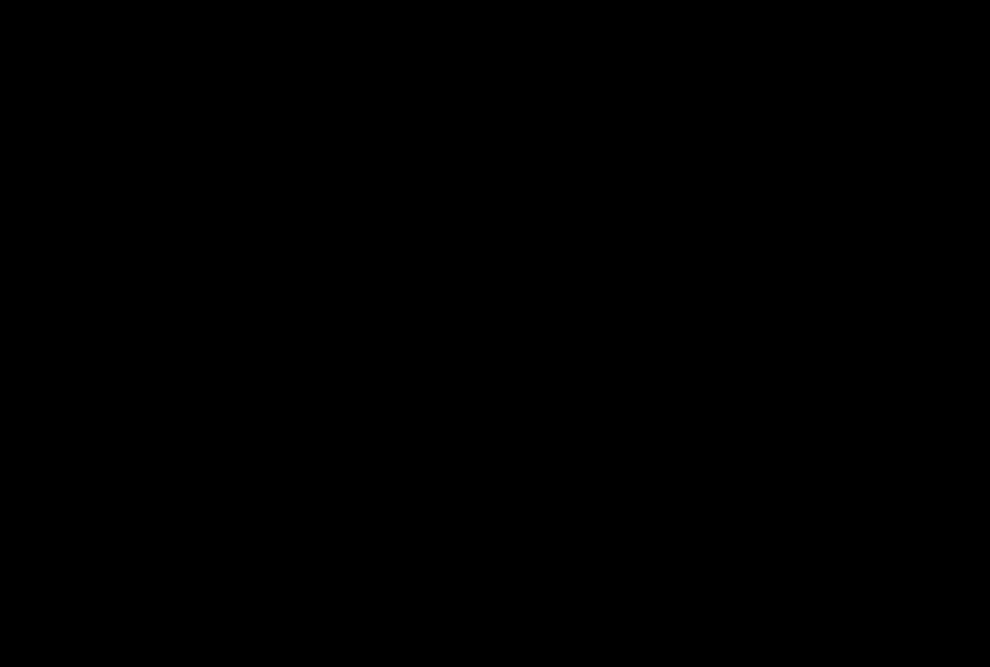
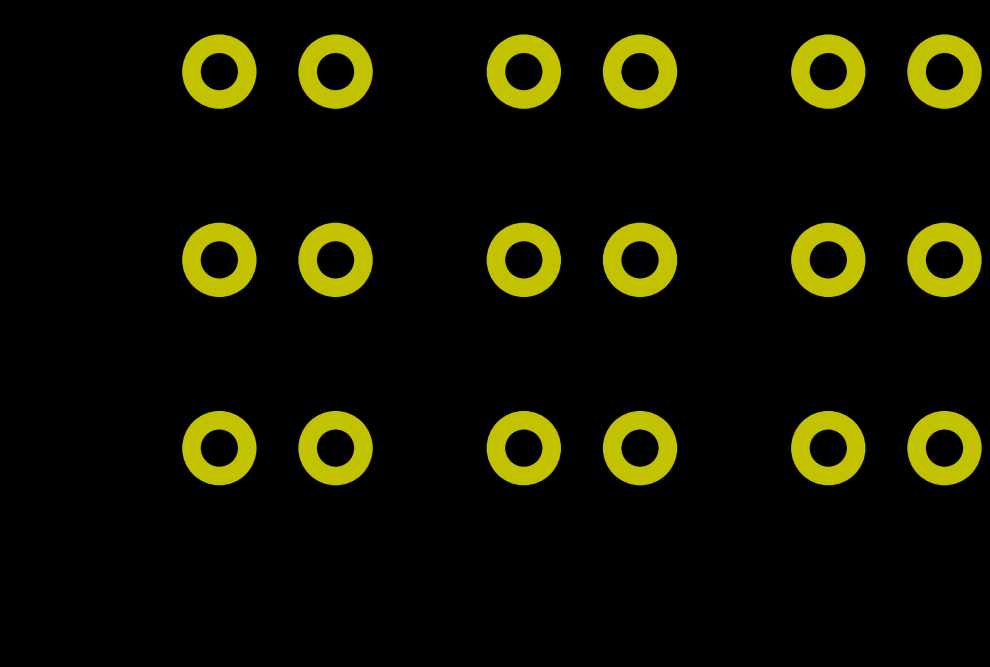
part: none -> (277, 71)
part: none -> (581, 71)
part: none -> (886, 71)
part: none -> (277, 259)
part: none -> (581, 259)
part: none -> (886, 259)
part: none -> (277, 448)
part: none -> (581, 448)
part: none -> (886, 448)

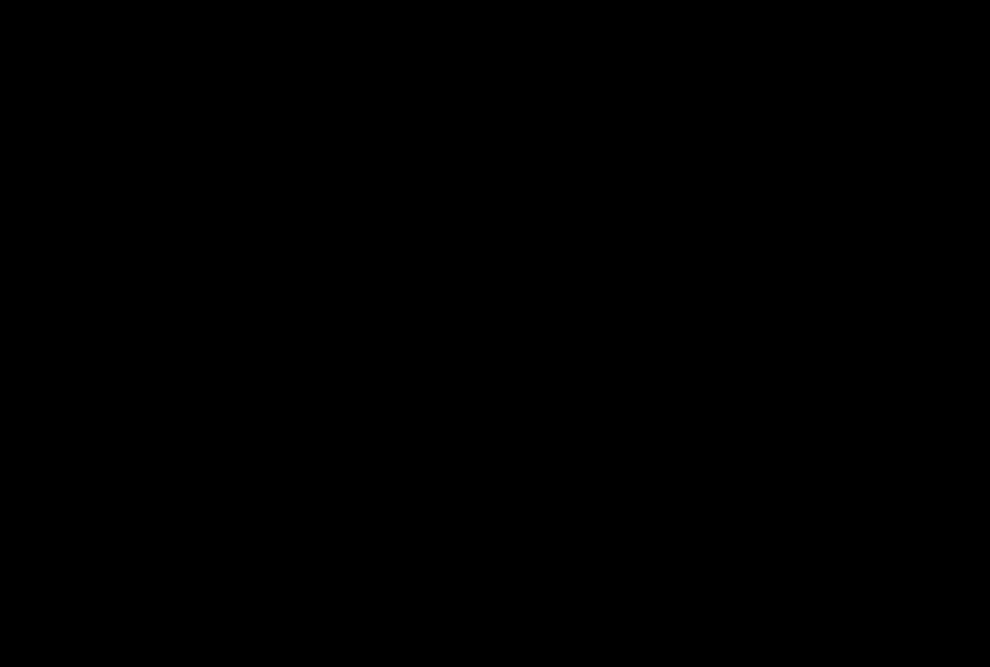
part: (277, 71) -> none
part: (581, 71) -> none
part: (886, 71) -> none
part: (277, 259) -> none
part: (581, 259) -> none
part: (886, 259) -> none
part: (277, 448) -> none
part: (581, 448) -> none
part: (886, 448) -> none

